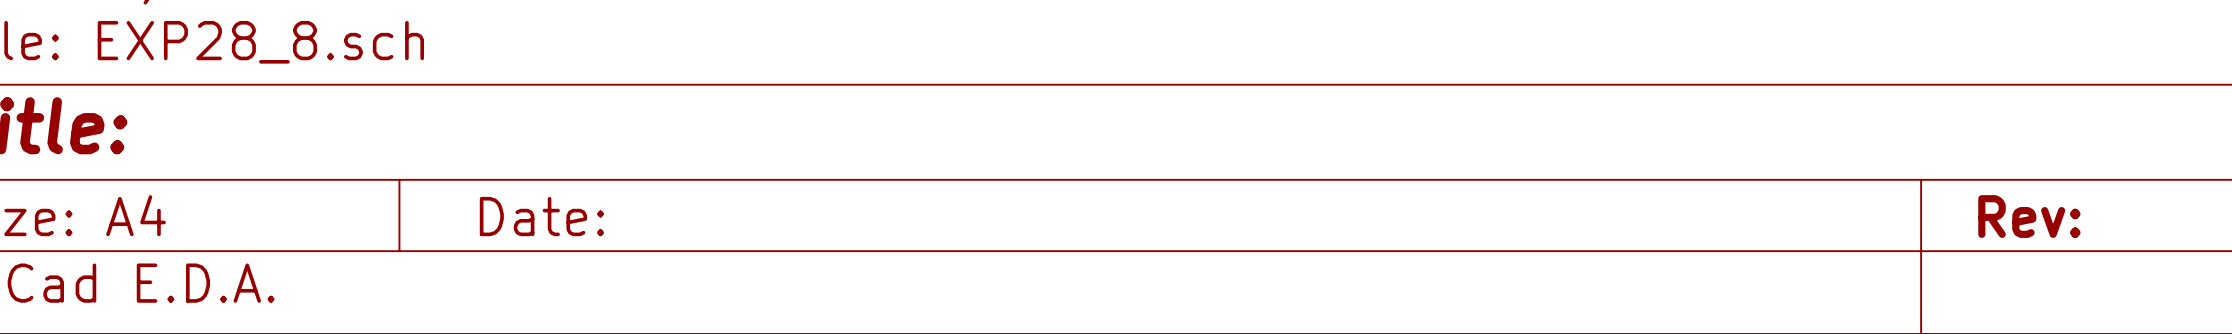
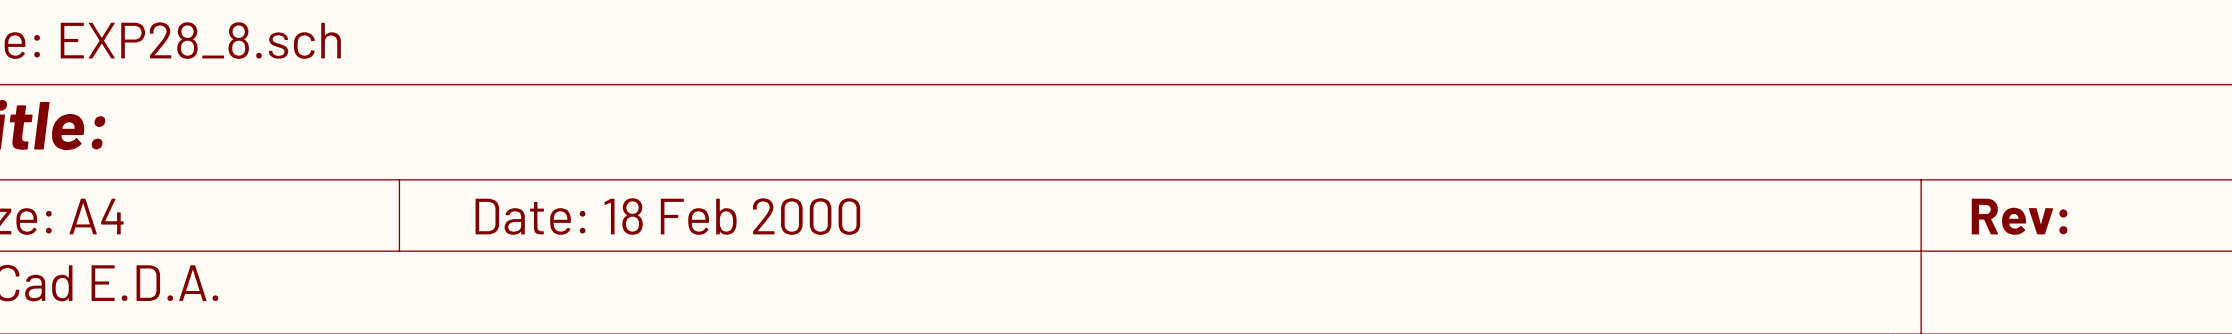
title block: Date: (541, 216) -> Date: 18 Feb 2000 (667, 216)

